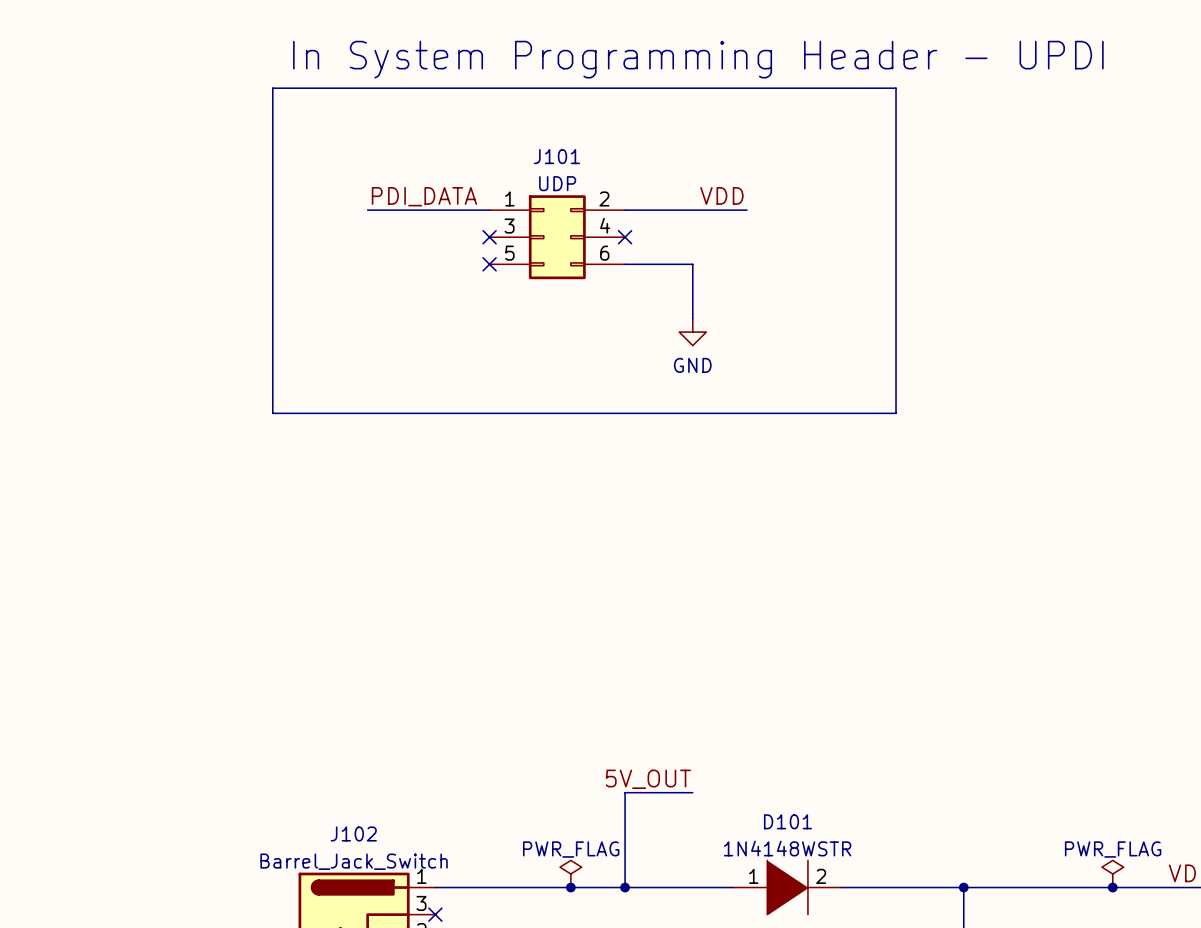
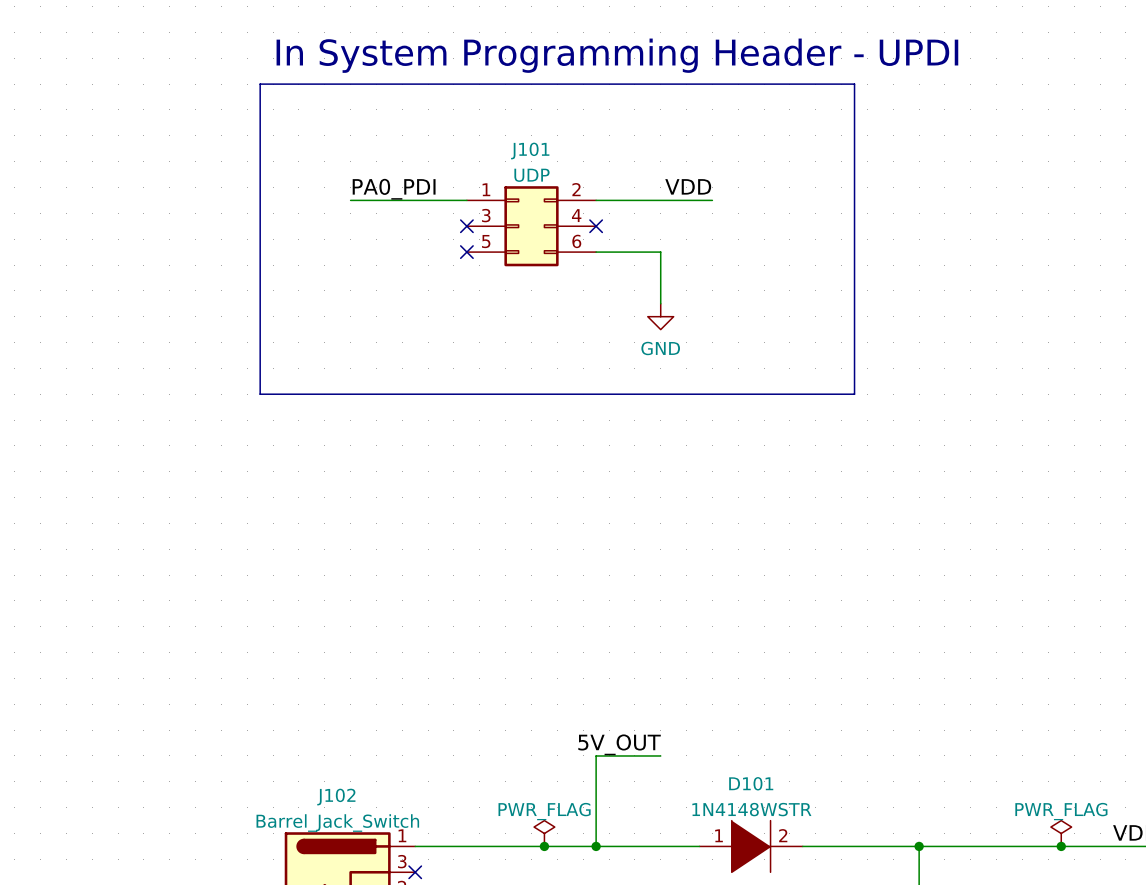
label: PDI_DATA (424, 196) -> PA0_PDI (394, 189)

